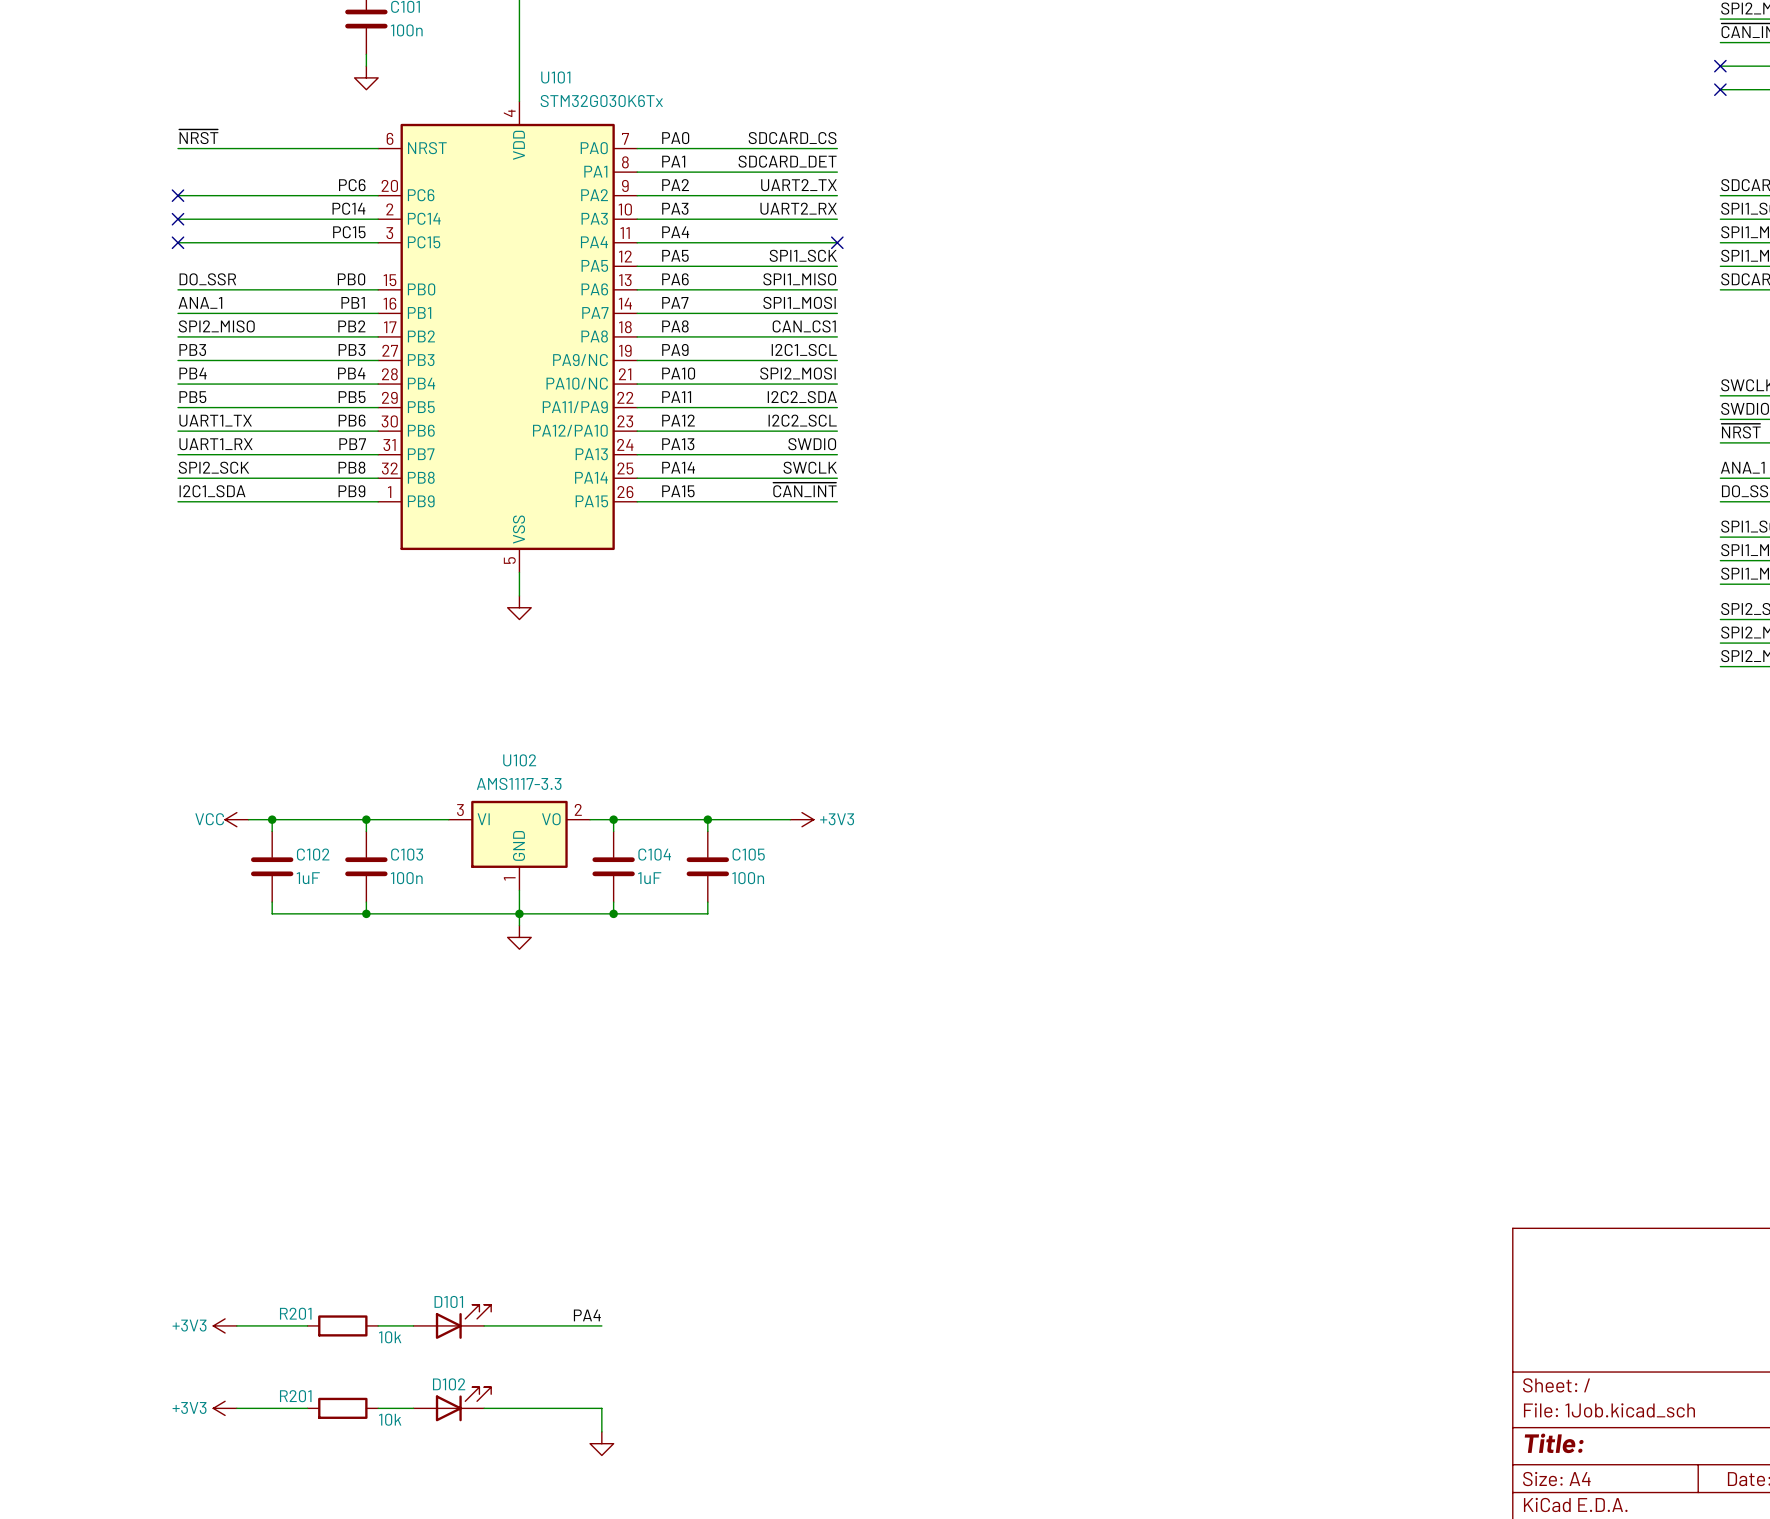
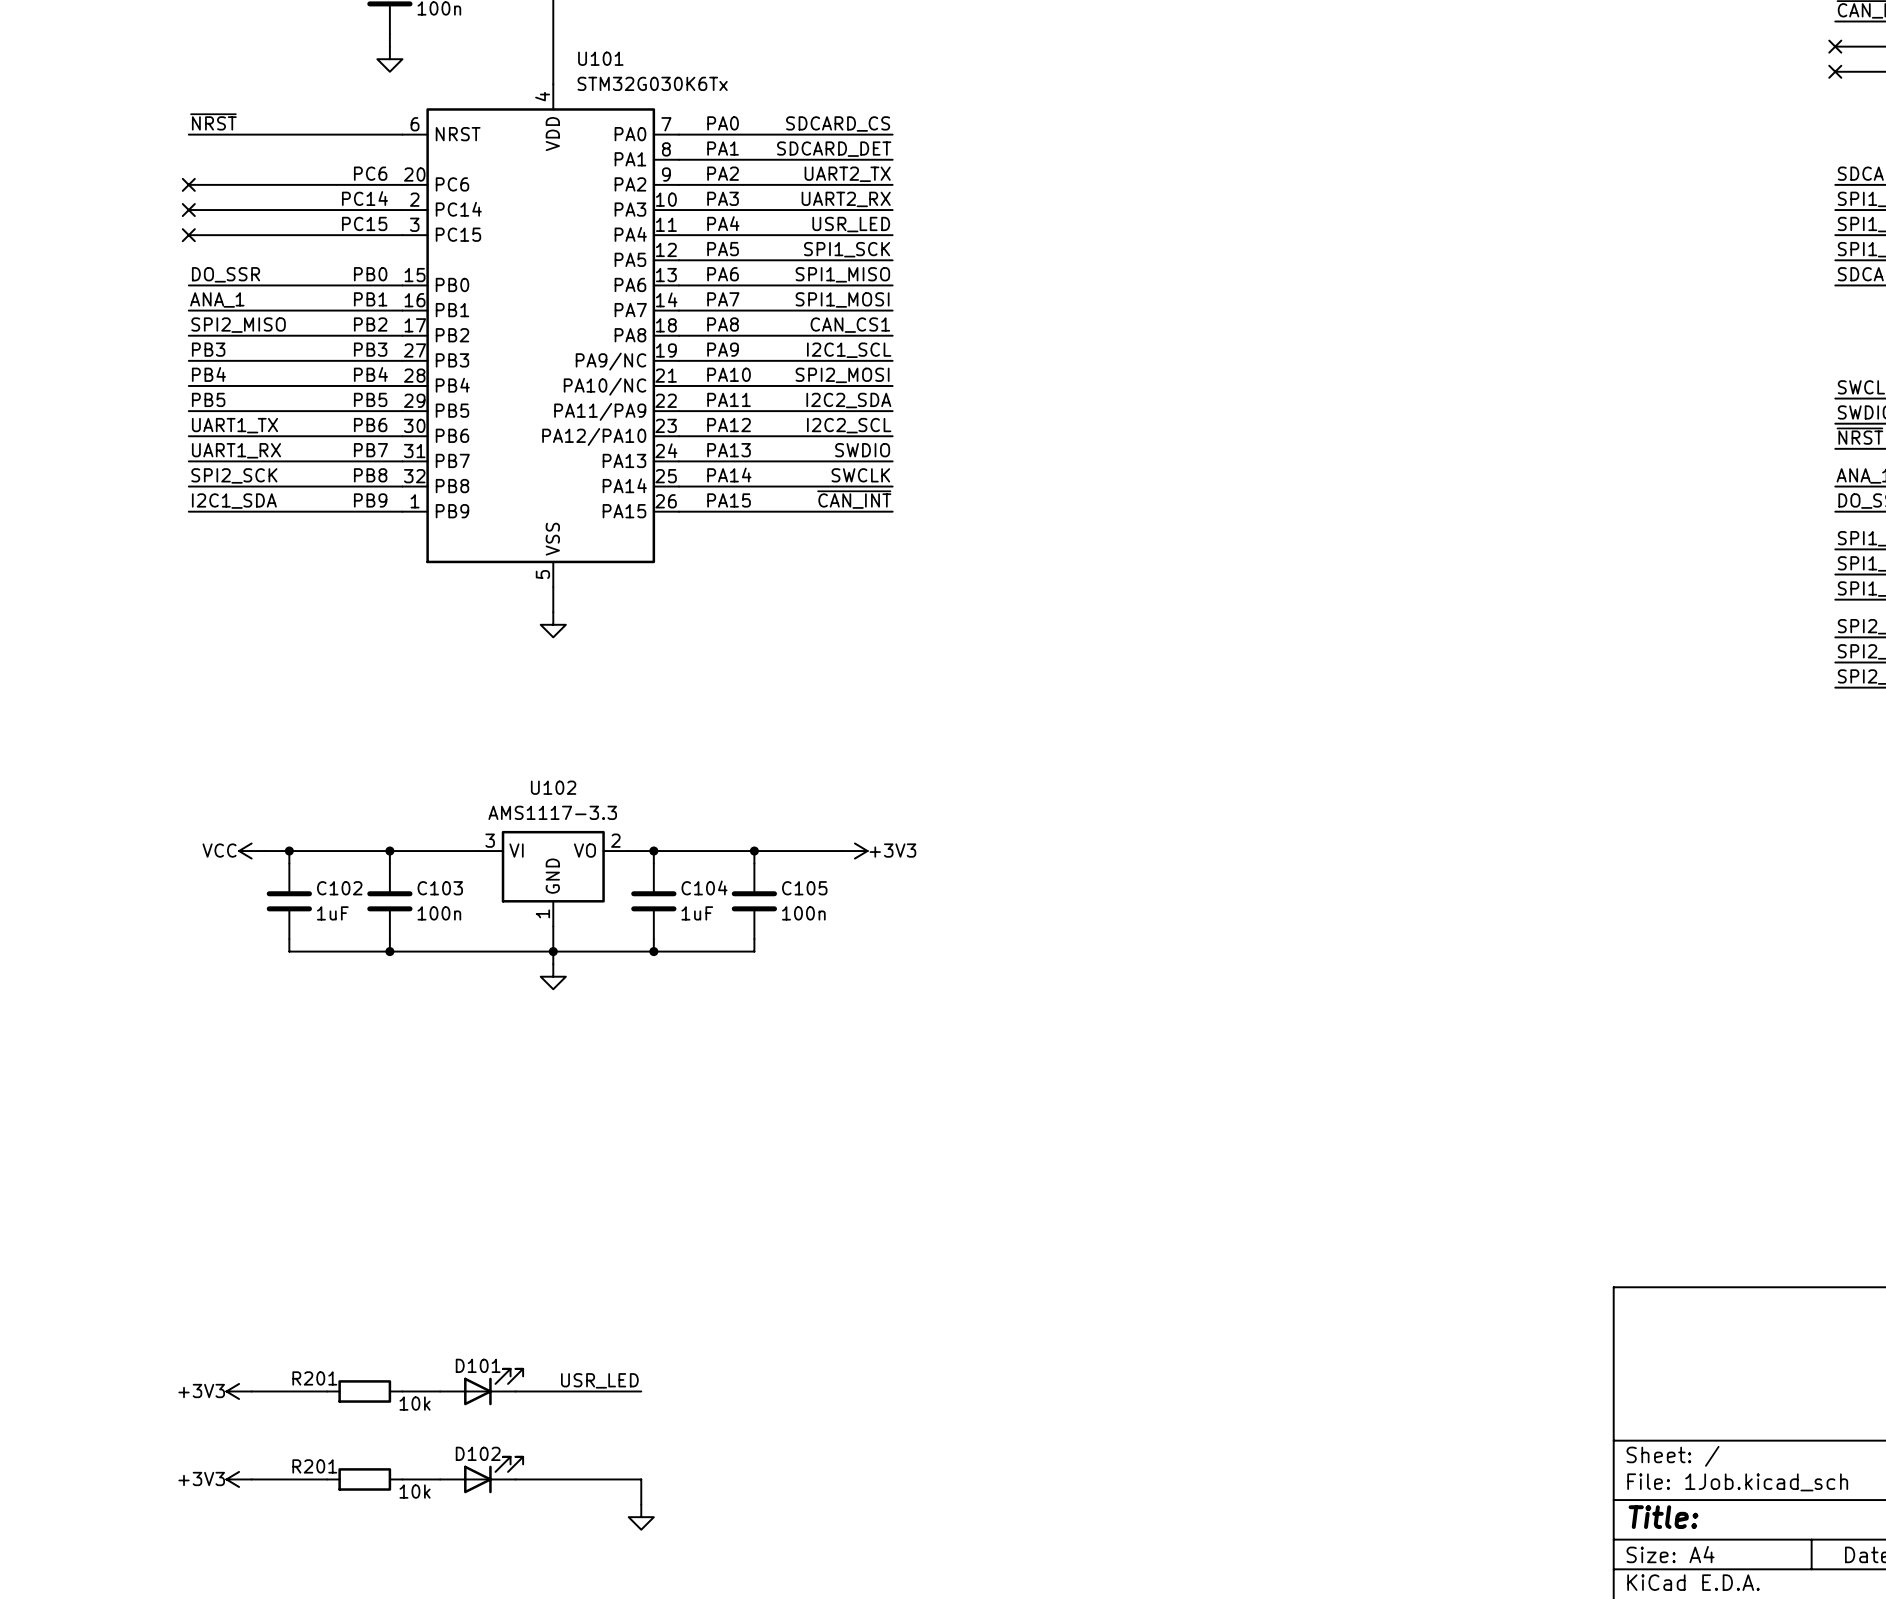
label: none -> USR_LED (851, 224)
no-connect mark: (837, 242) -> none
label: PA4 (587, 1315) -> USR_LED (599, 1380)

